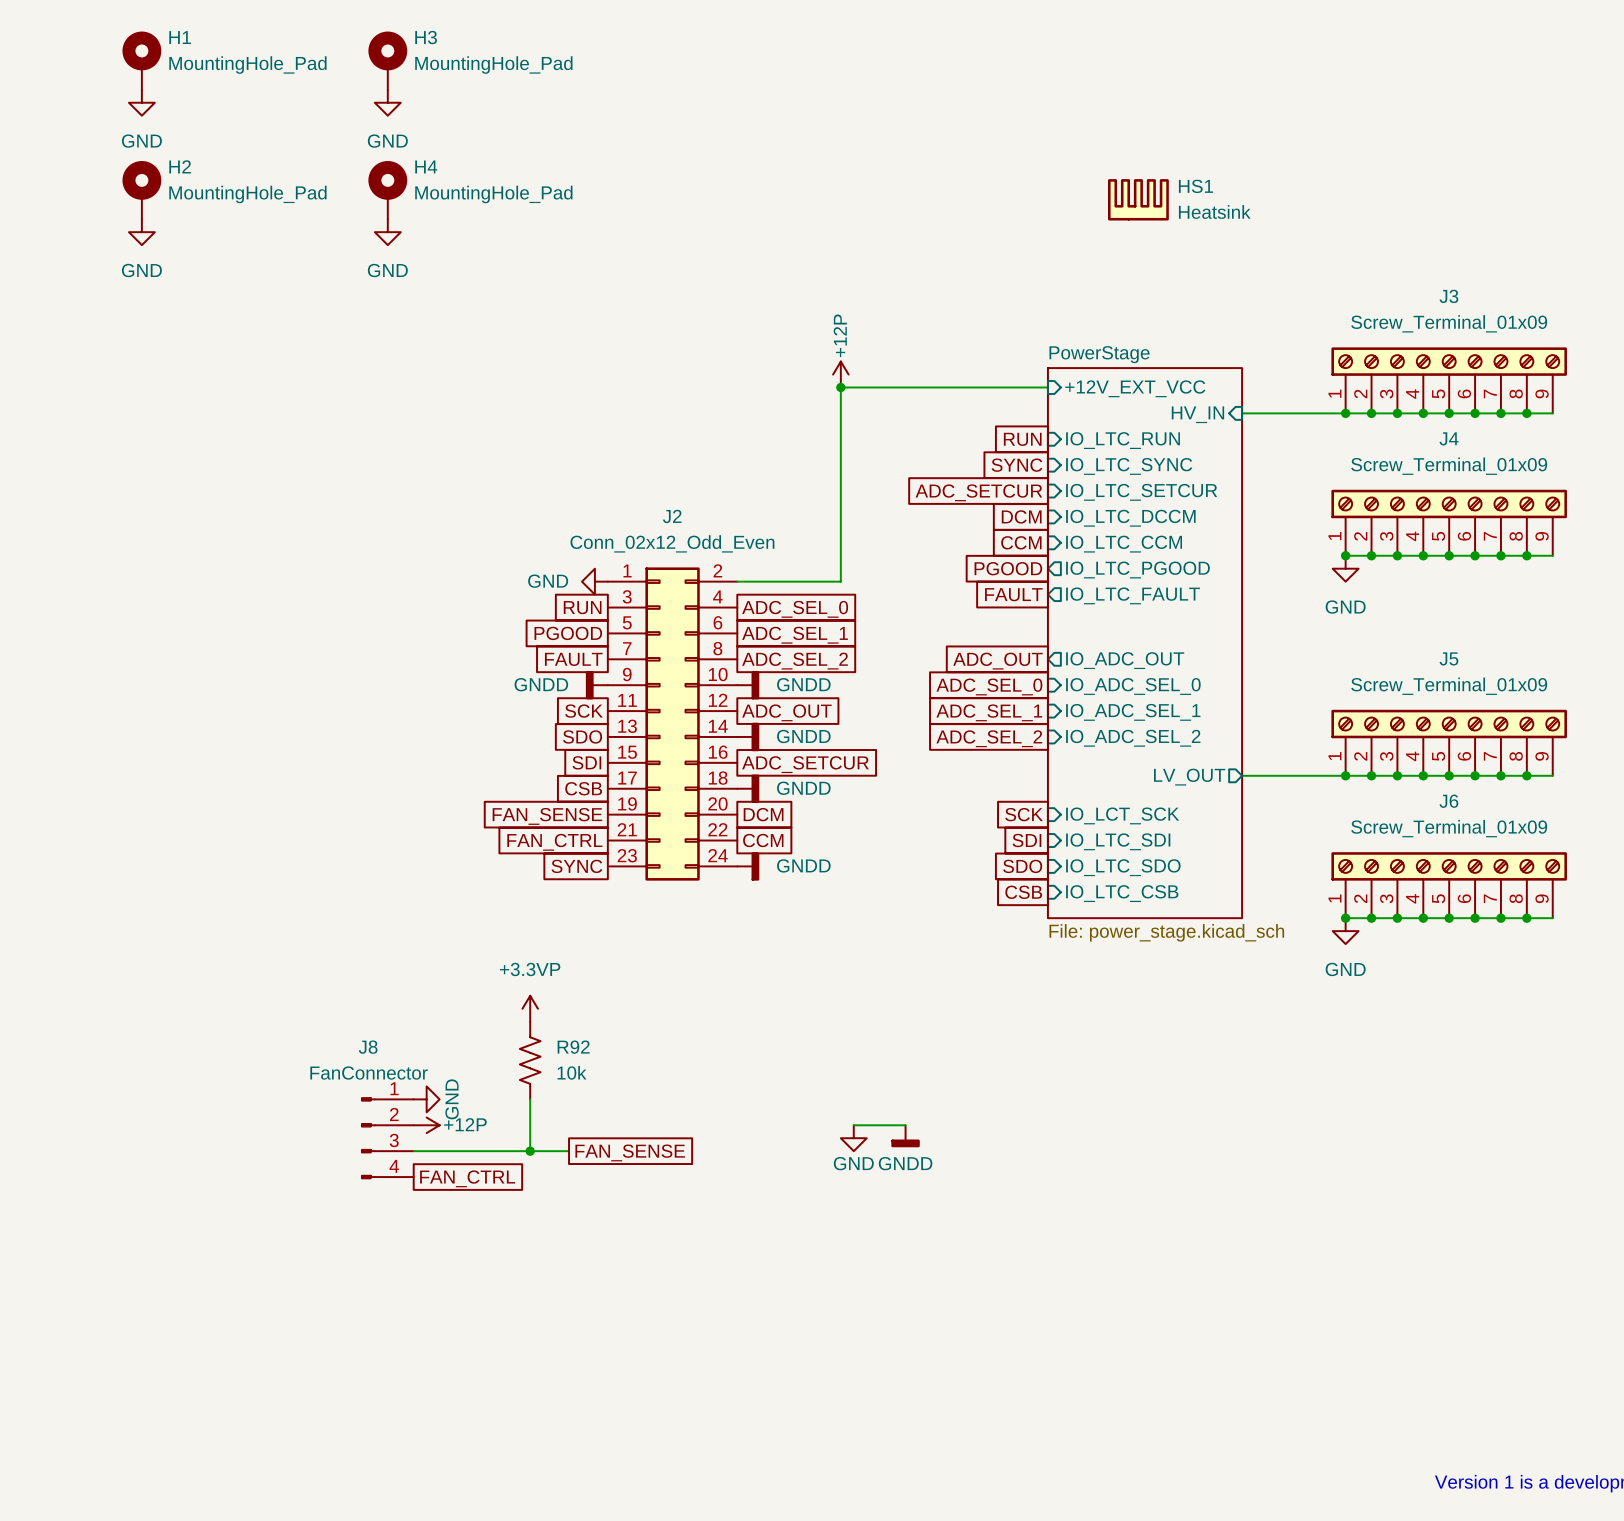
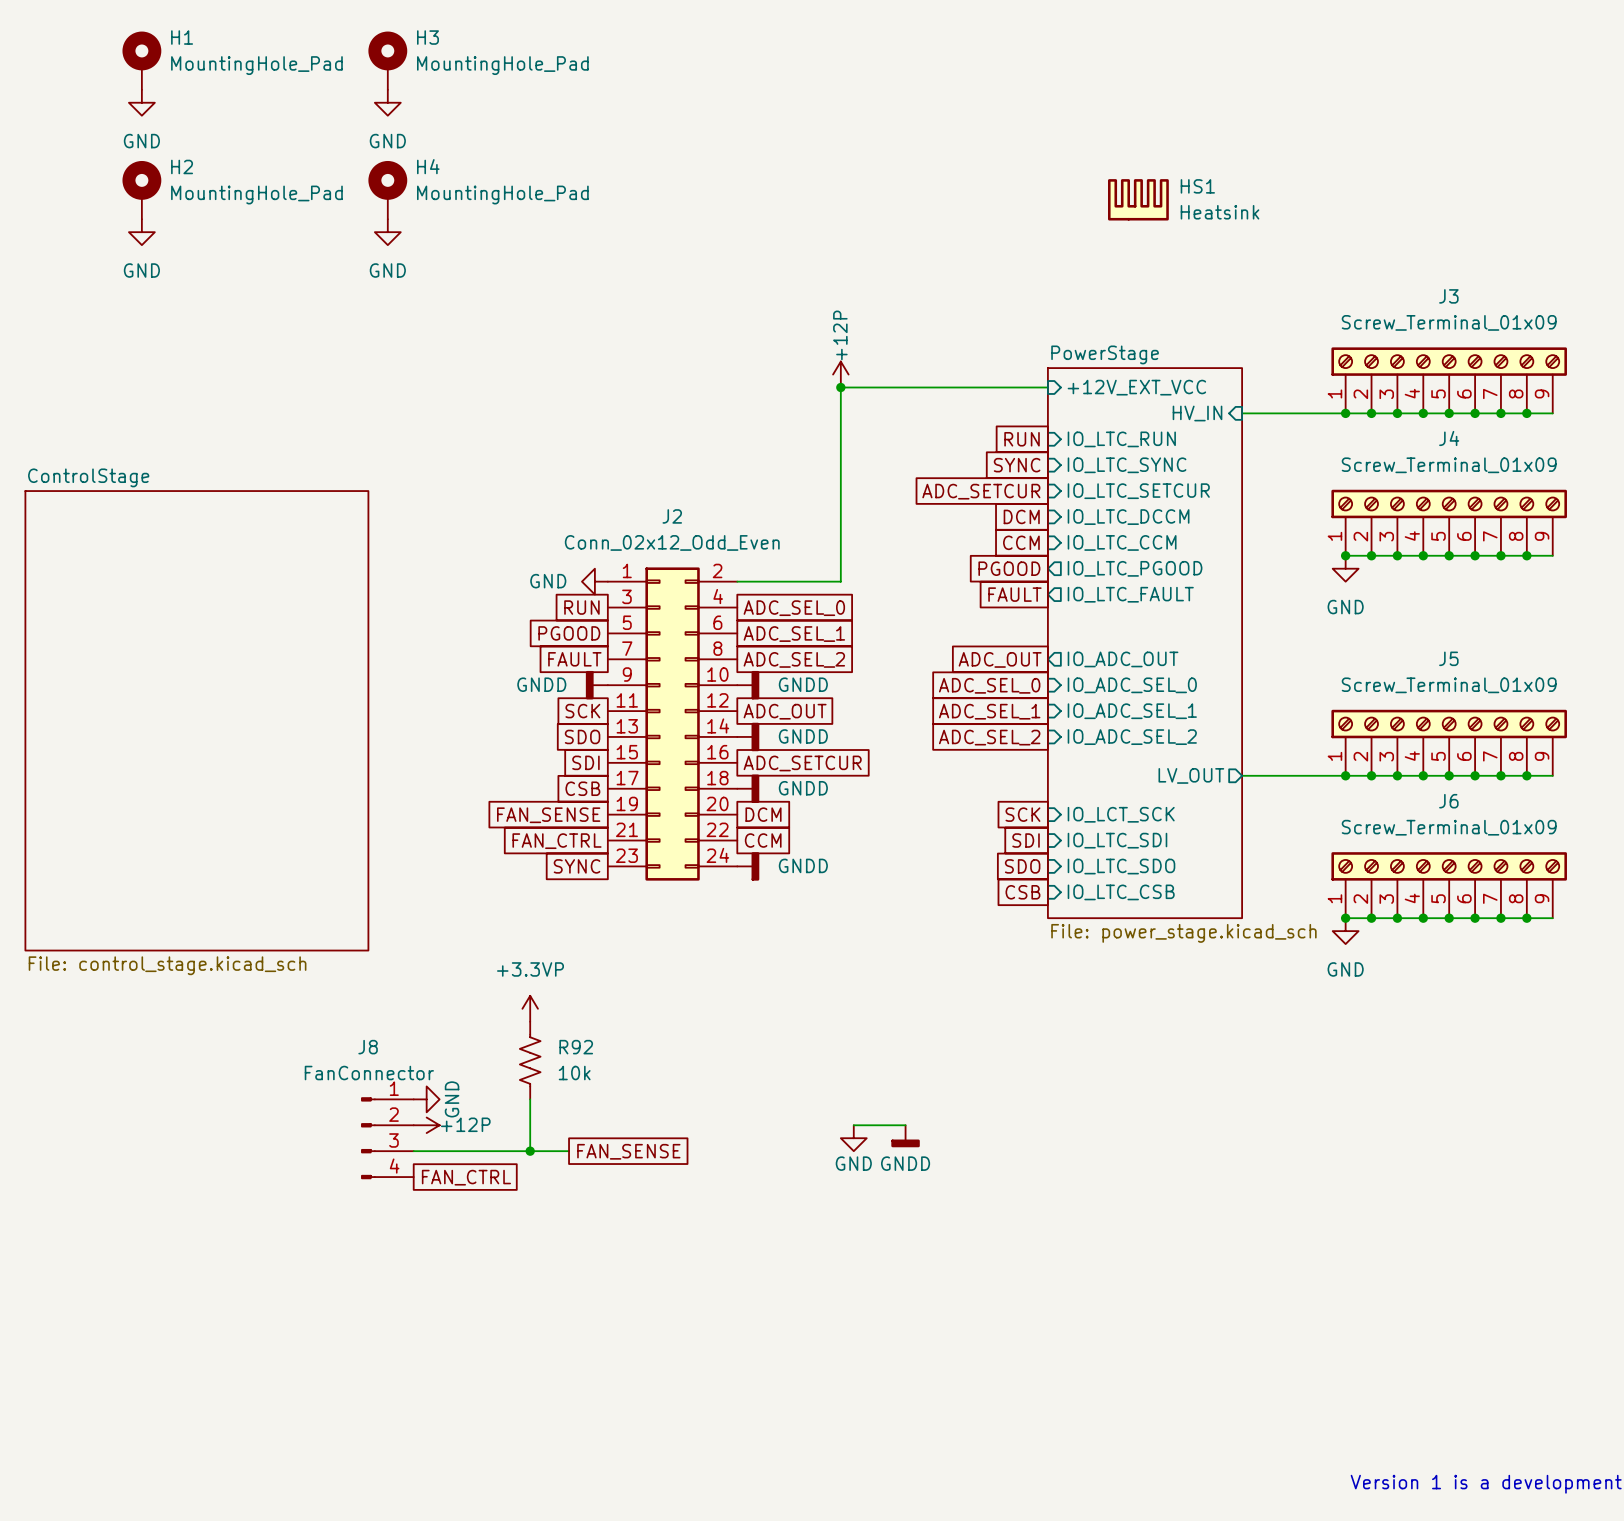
sheet ControlStage: none -> File: control_stage.kicad_sch (196, 720)

